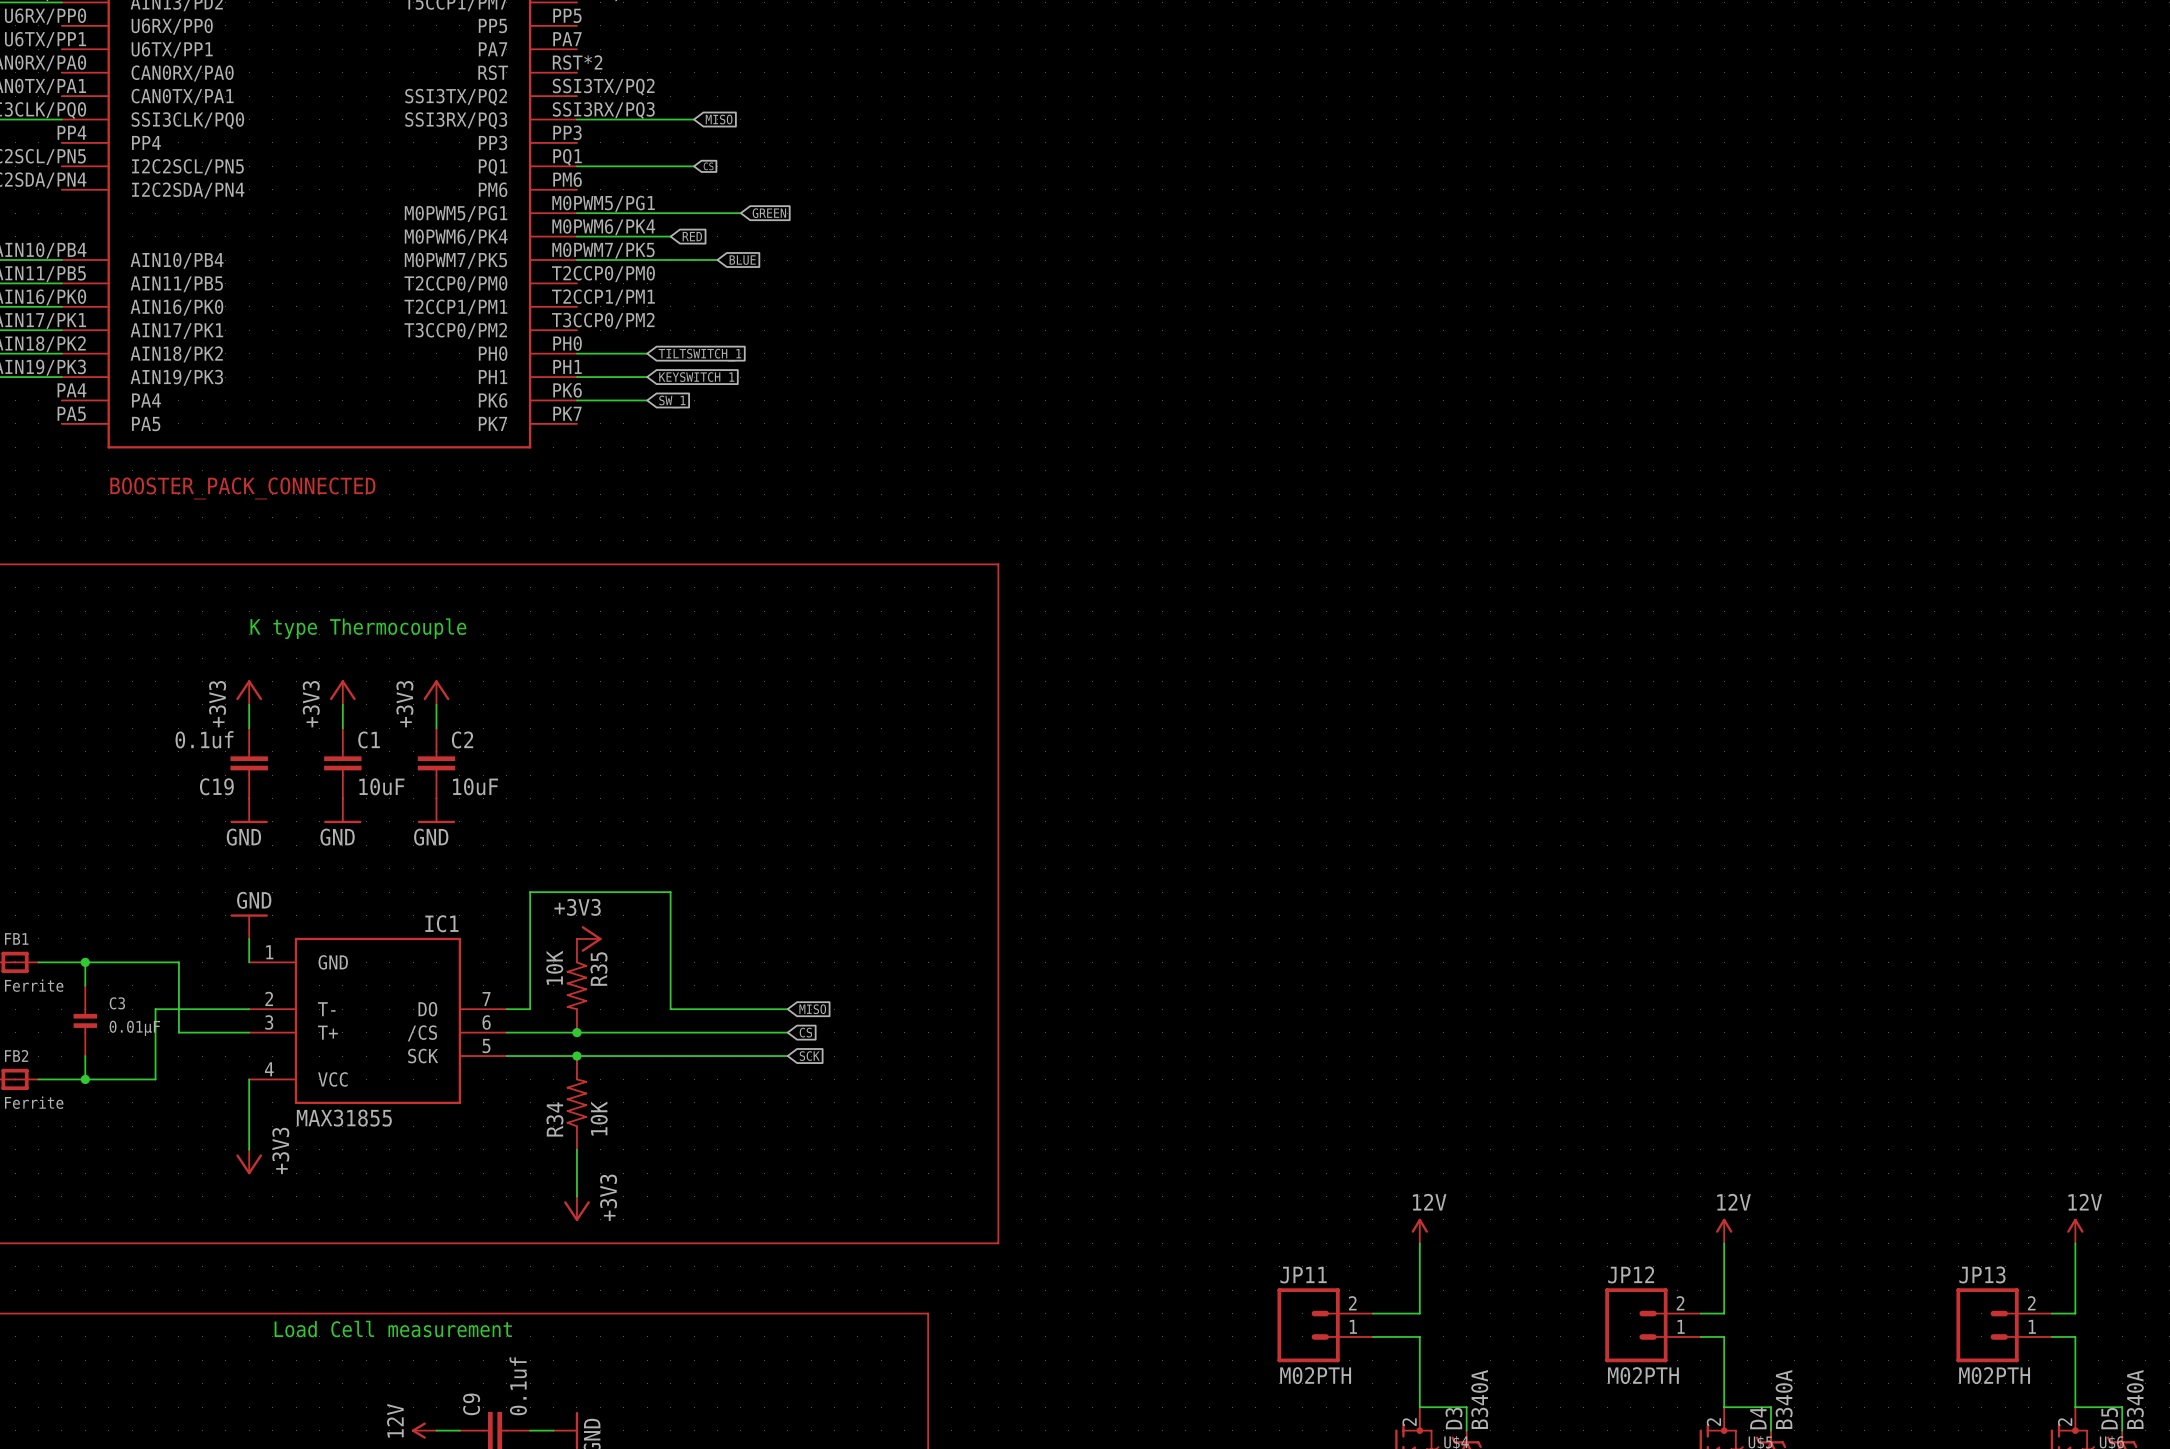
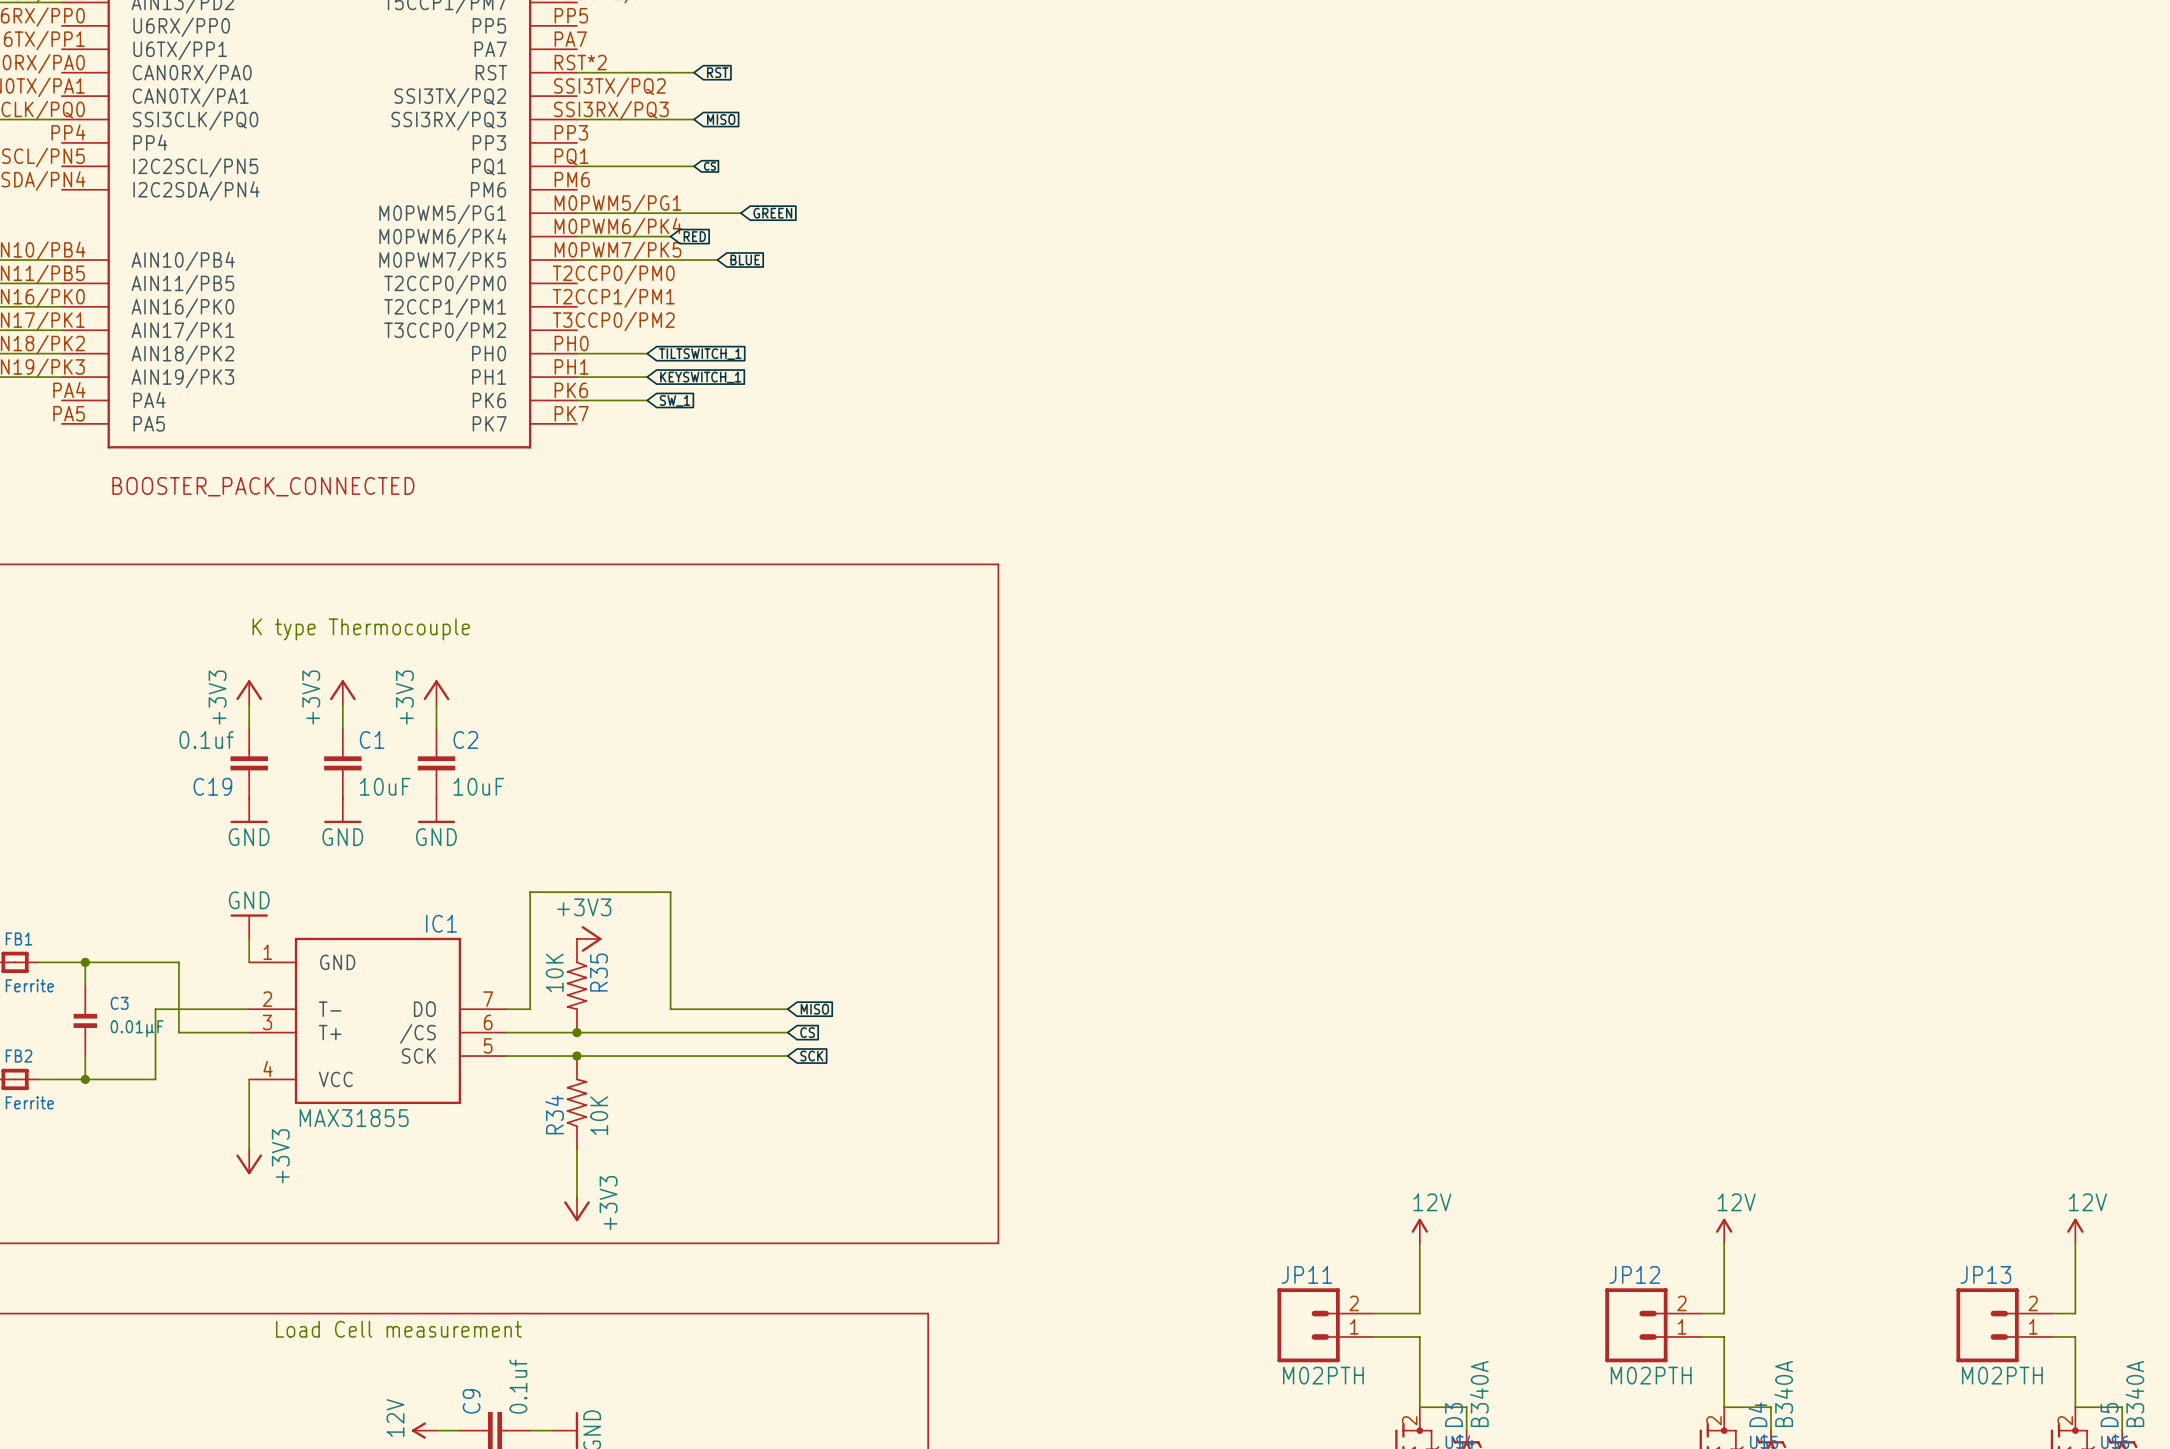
wire: none -> (576, 72) (694, 72)
global label: none -> RST (717, 72)

